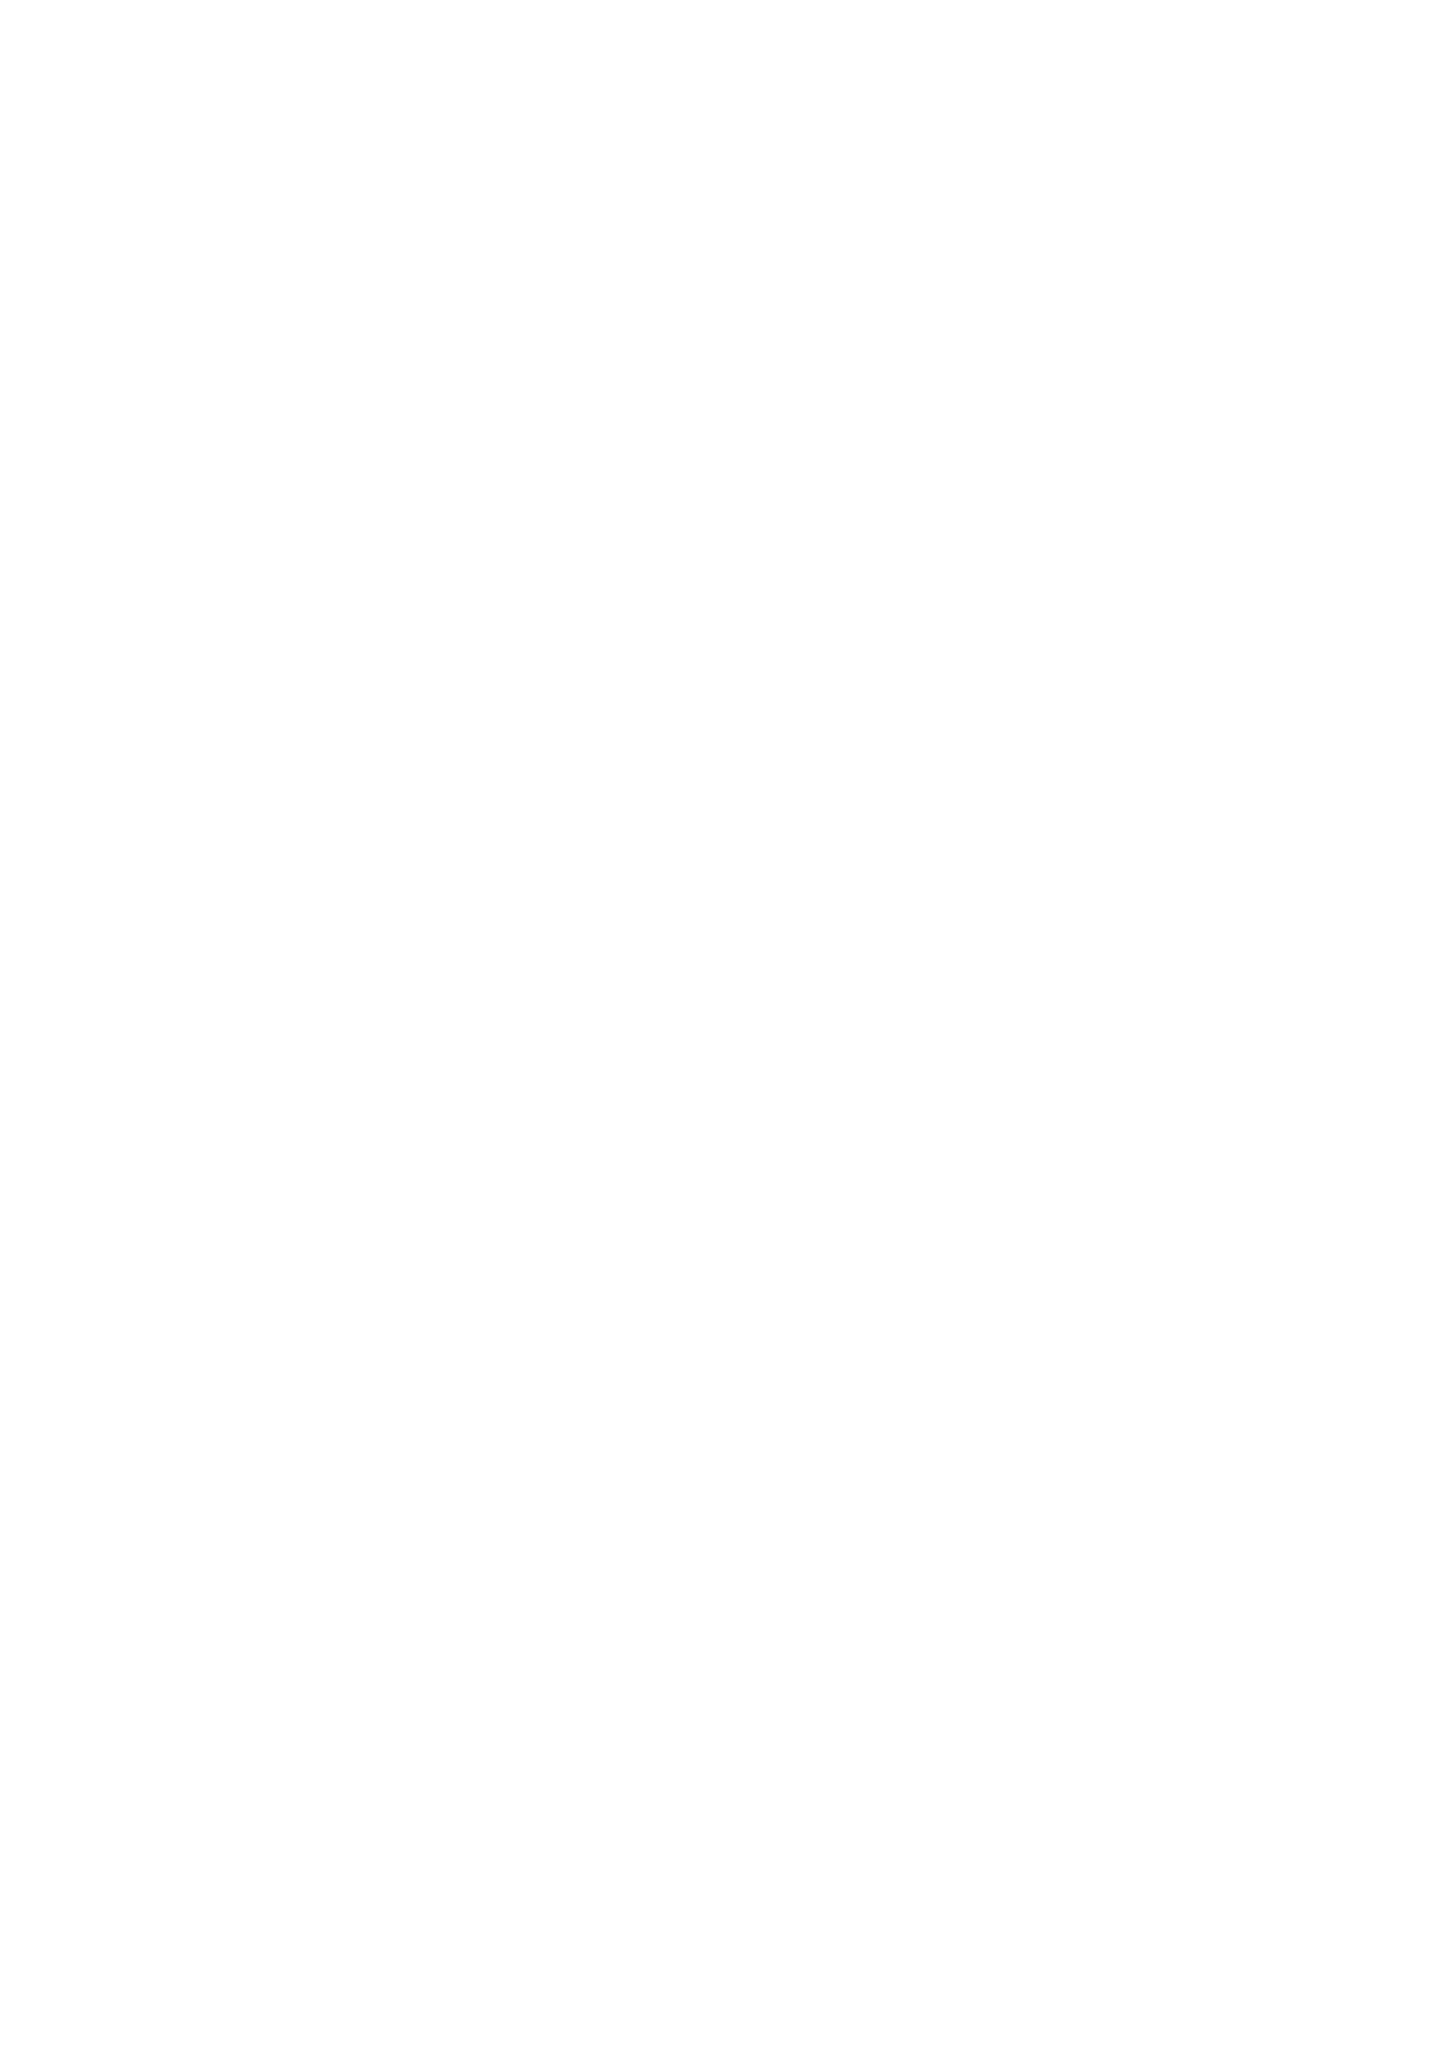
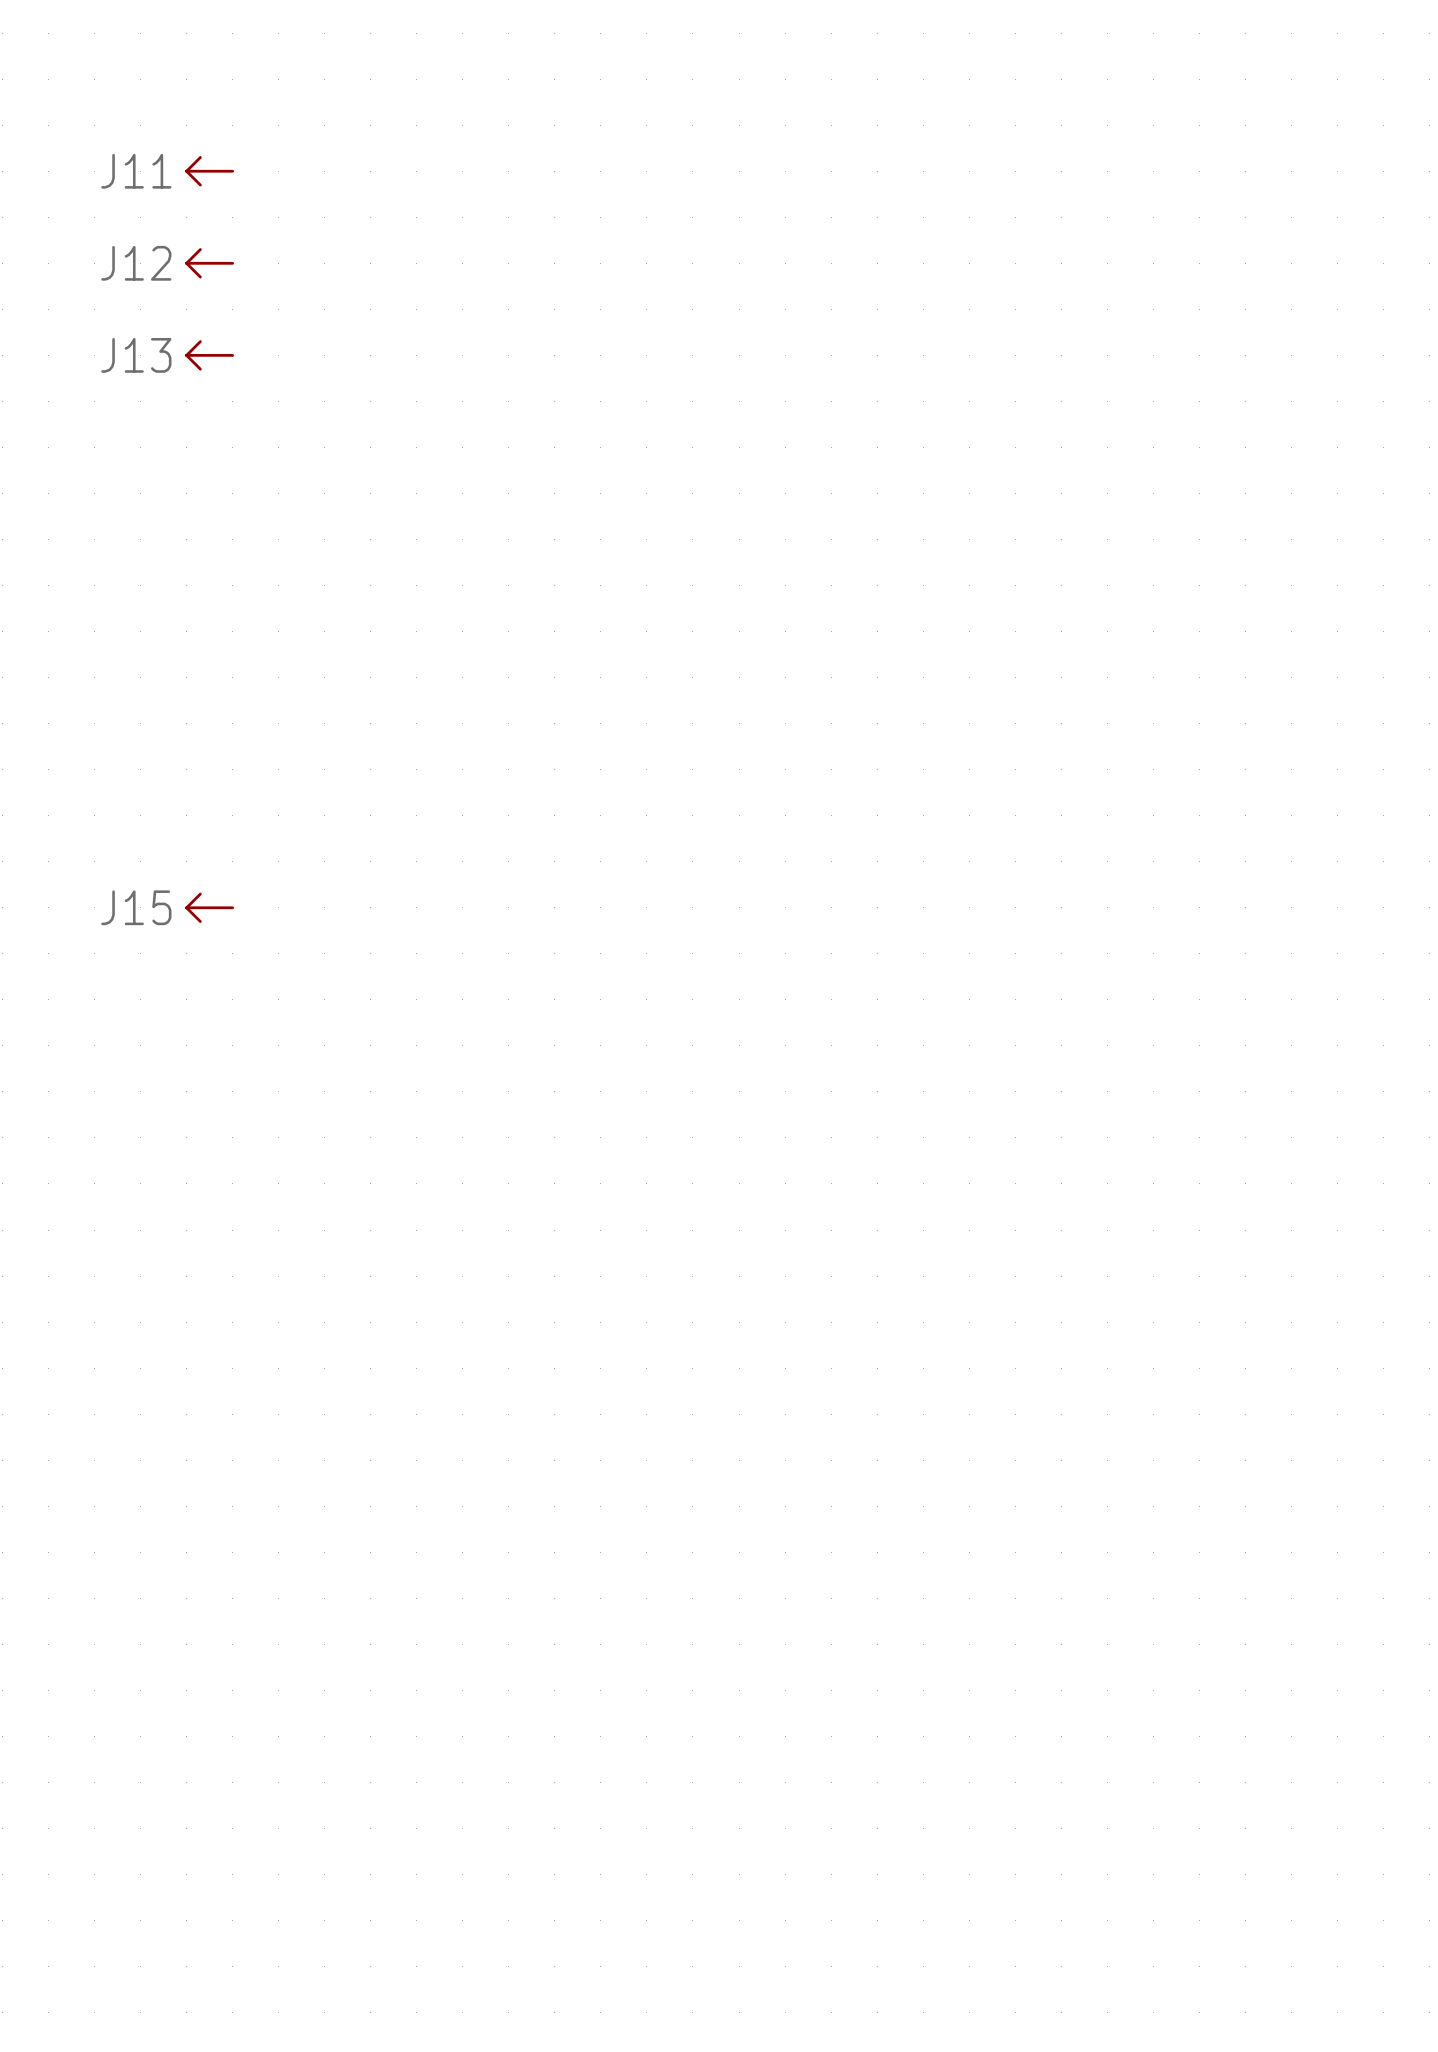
J11: none -> (209, 171)
J12: none -> (209, 263)
J13: none -> (209, 355)
J15: none -> (209, 907)

